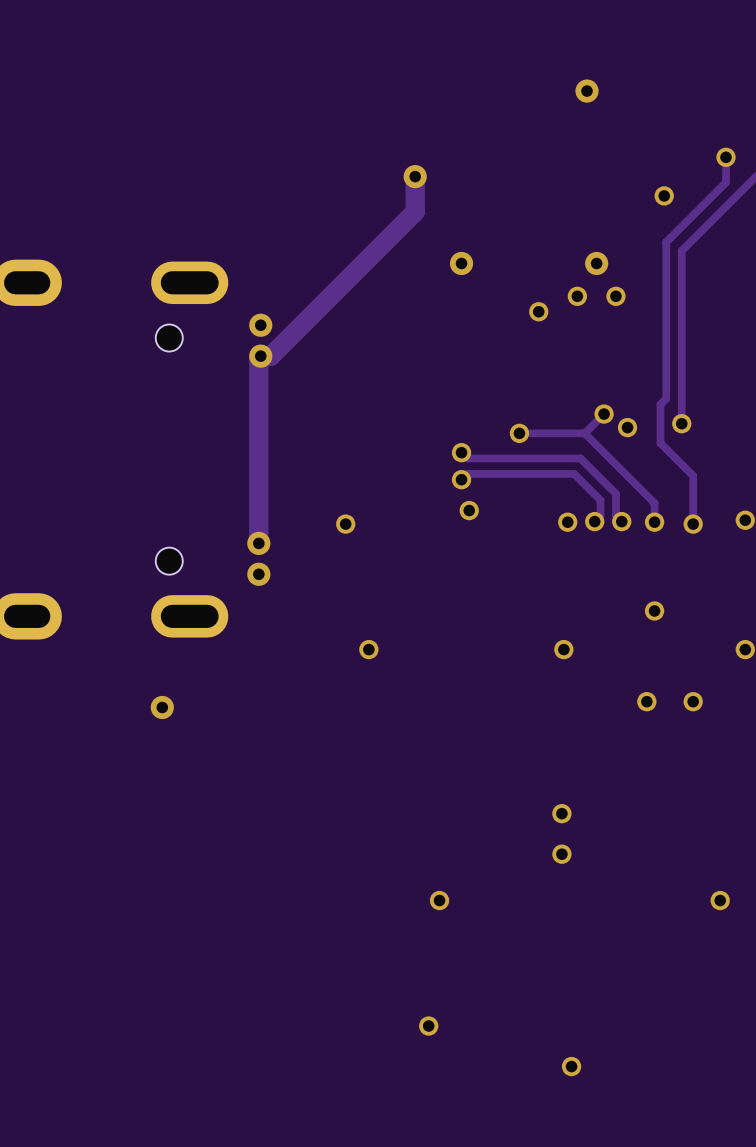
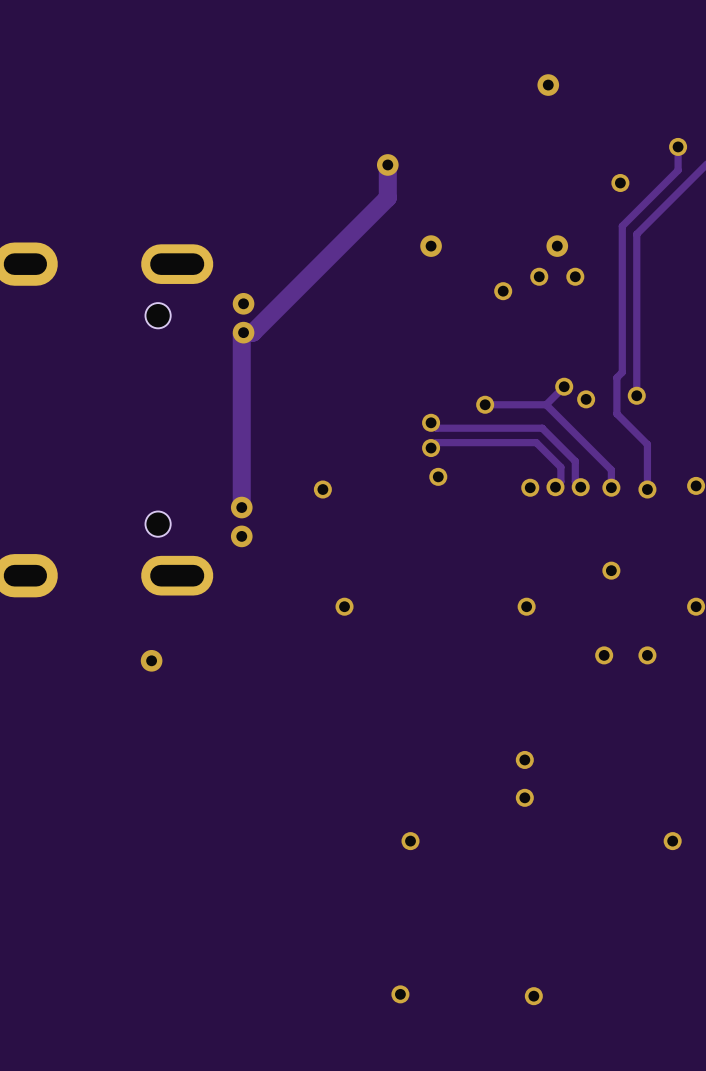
via position: (428, 1026) -> (400, 994)

